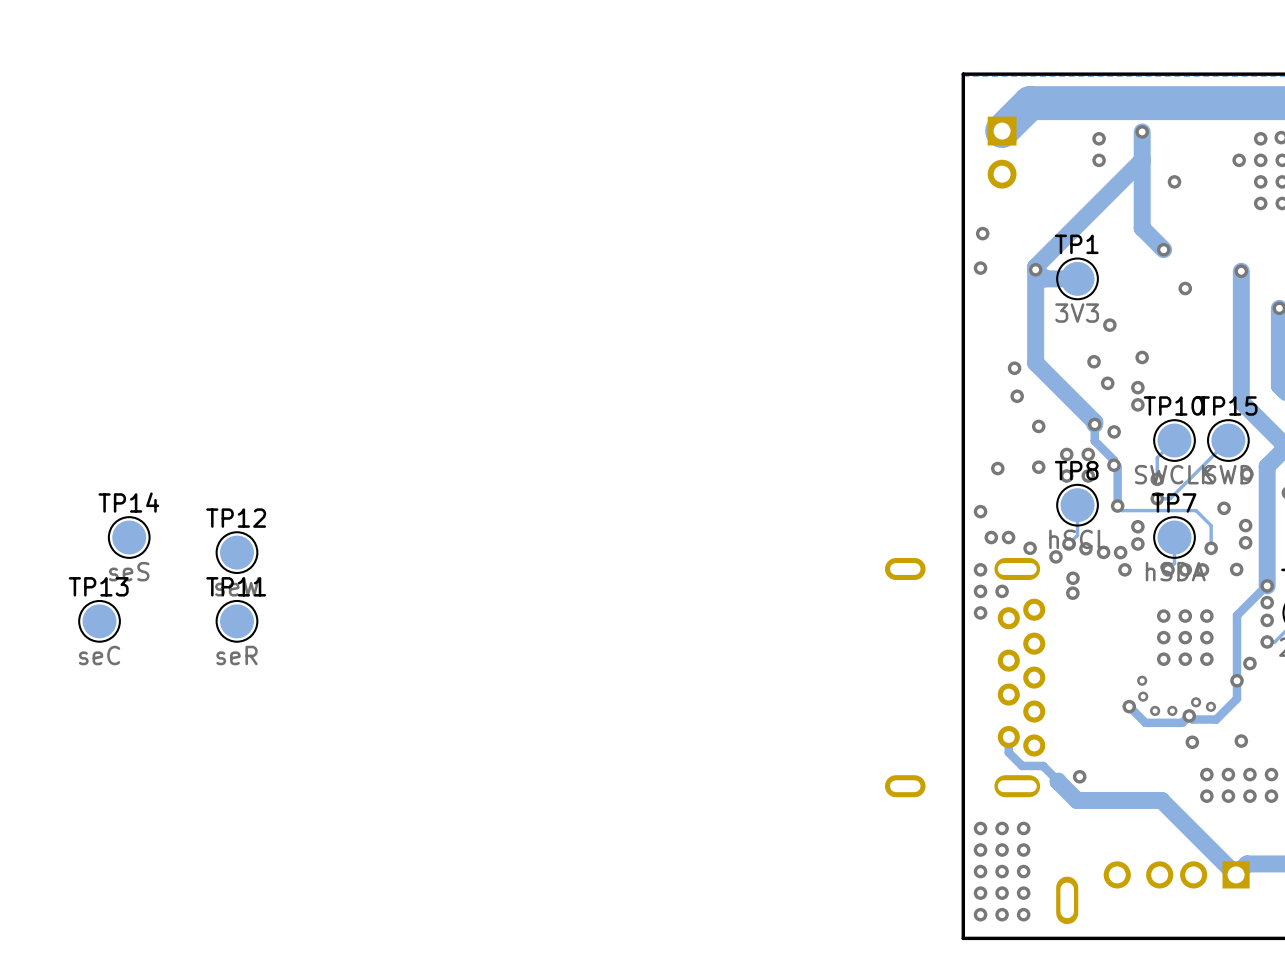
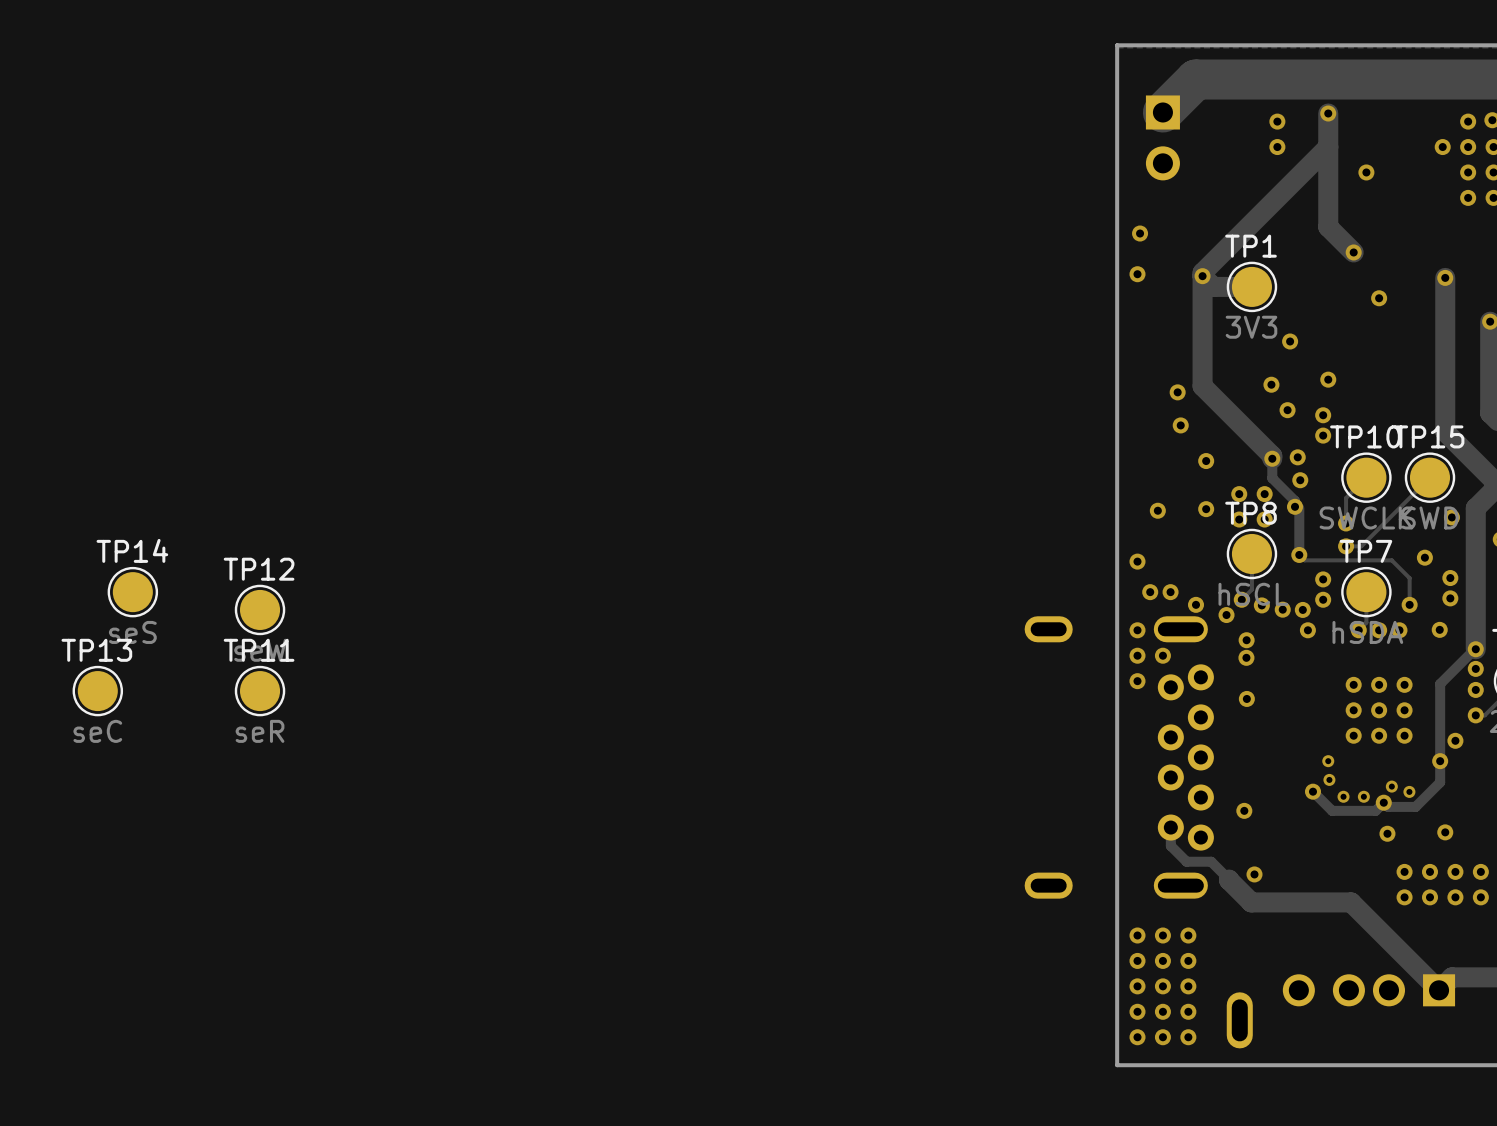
via: none -> (1297, 457)
via: (1114, 431) -> none
via: none -> (1300, 480)
via: none -> (1246, 698)
via: none -> (1244, 810)

